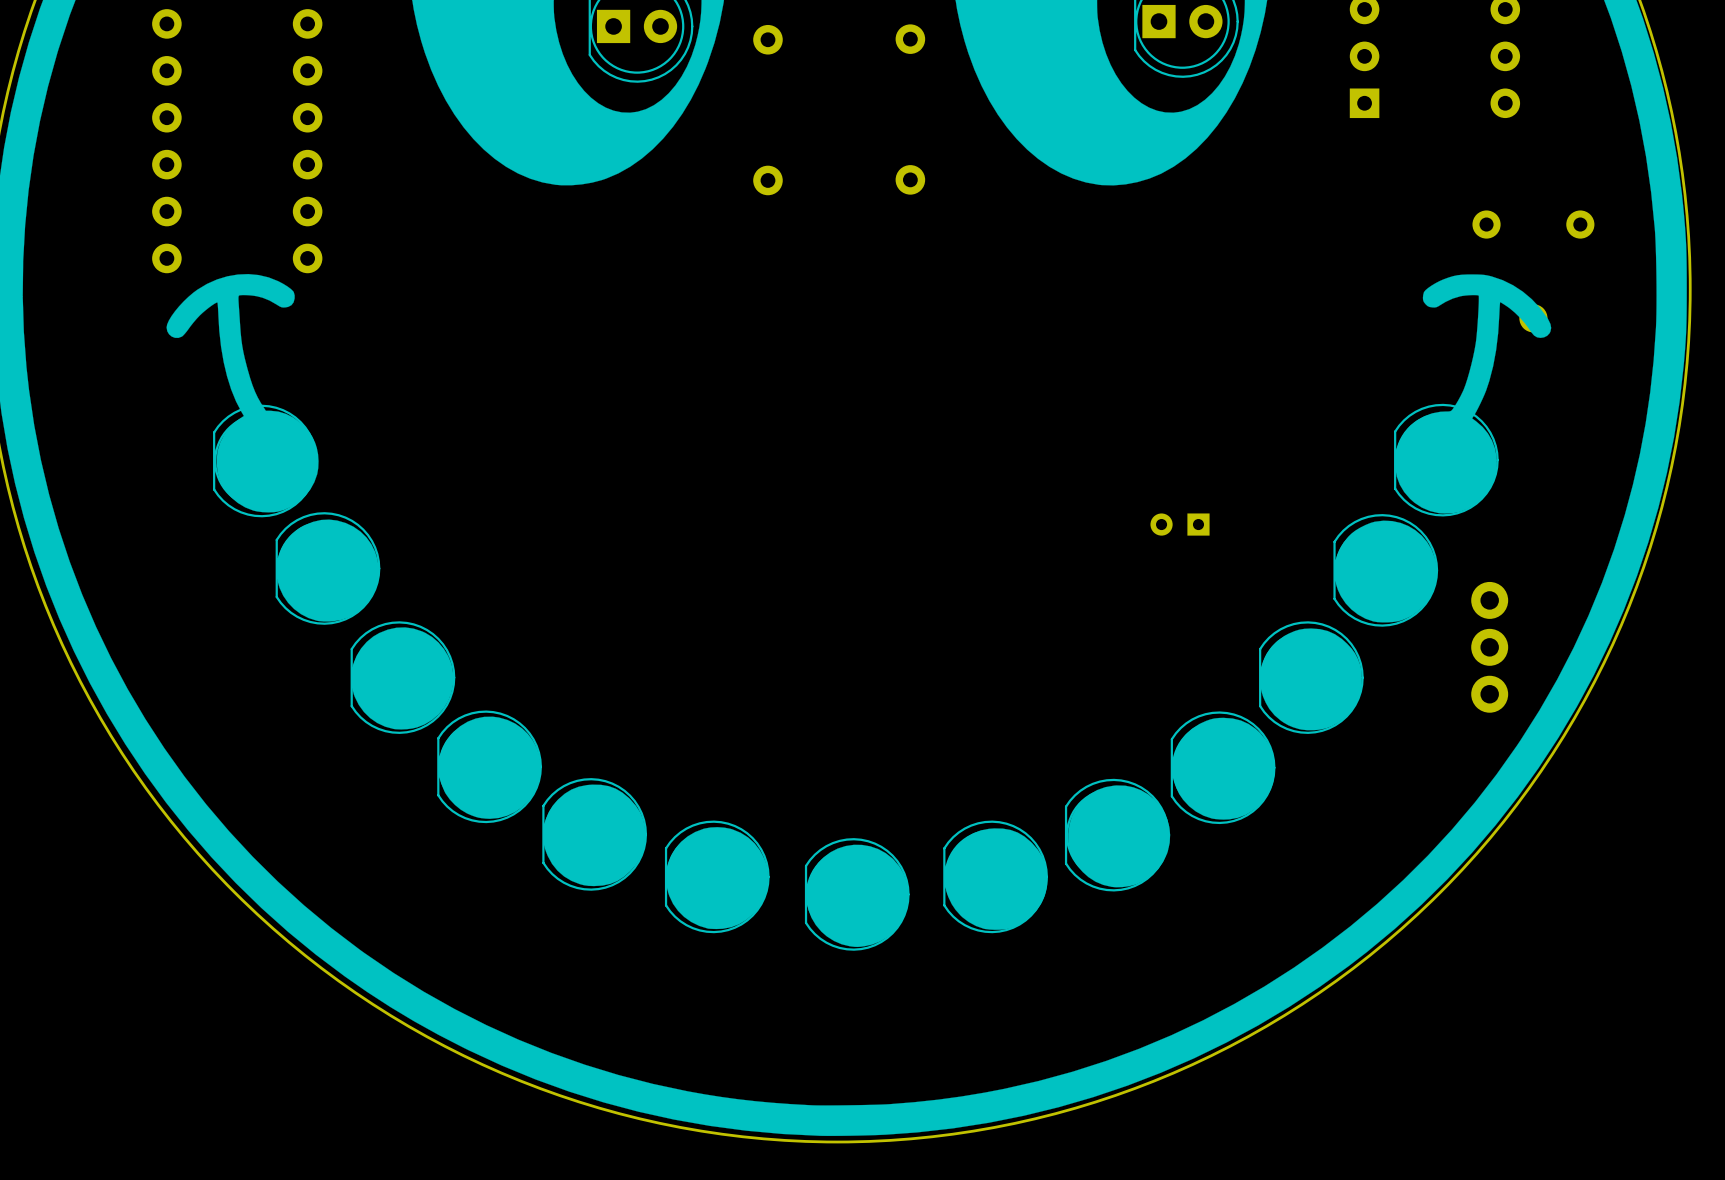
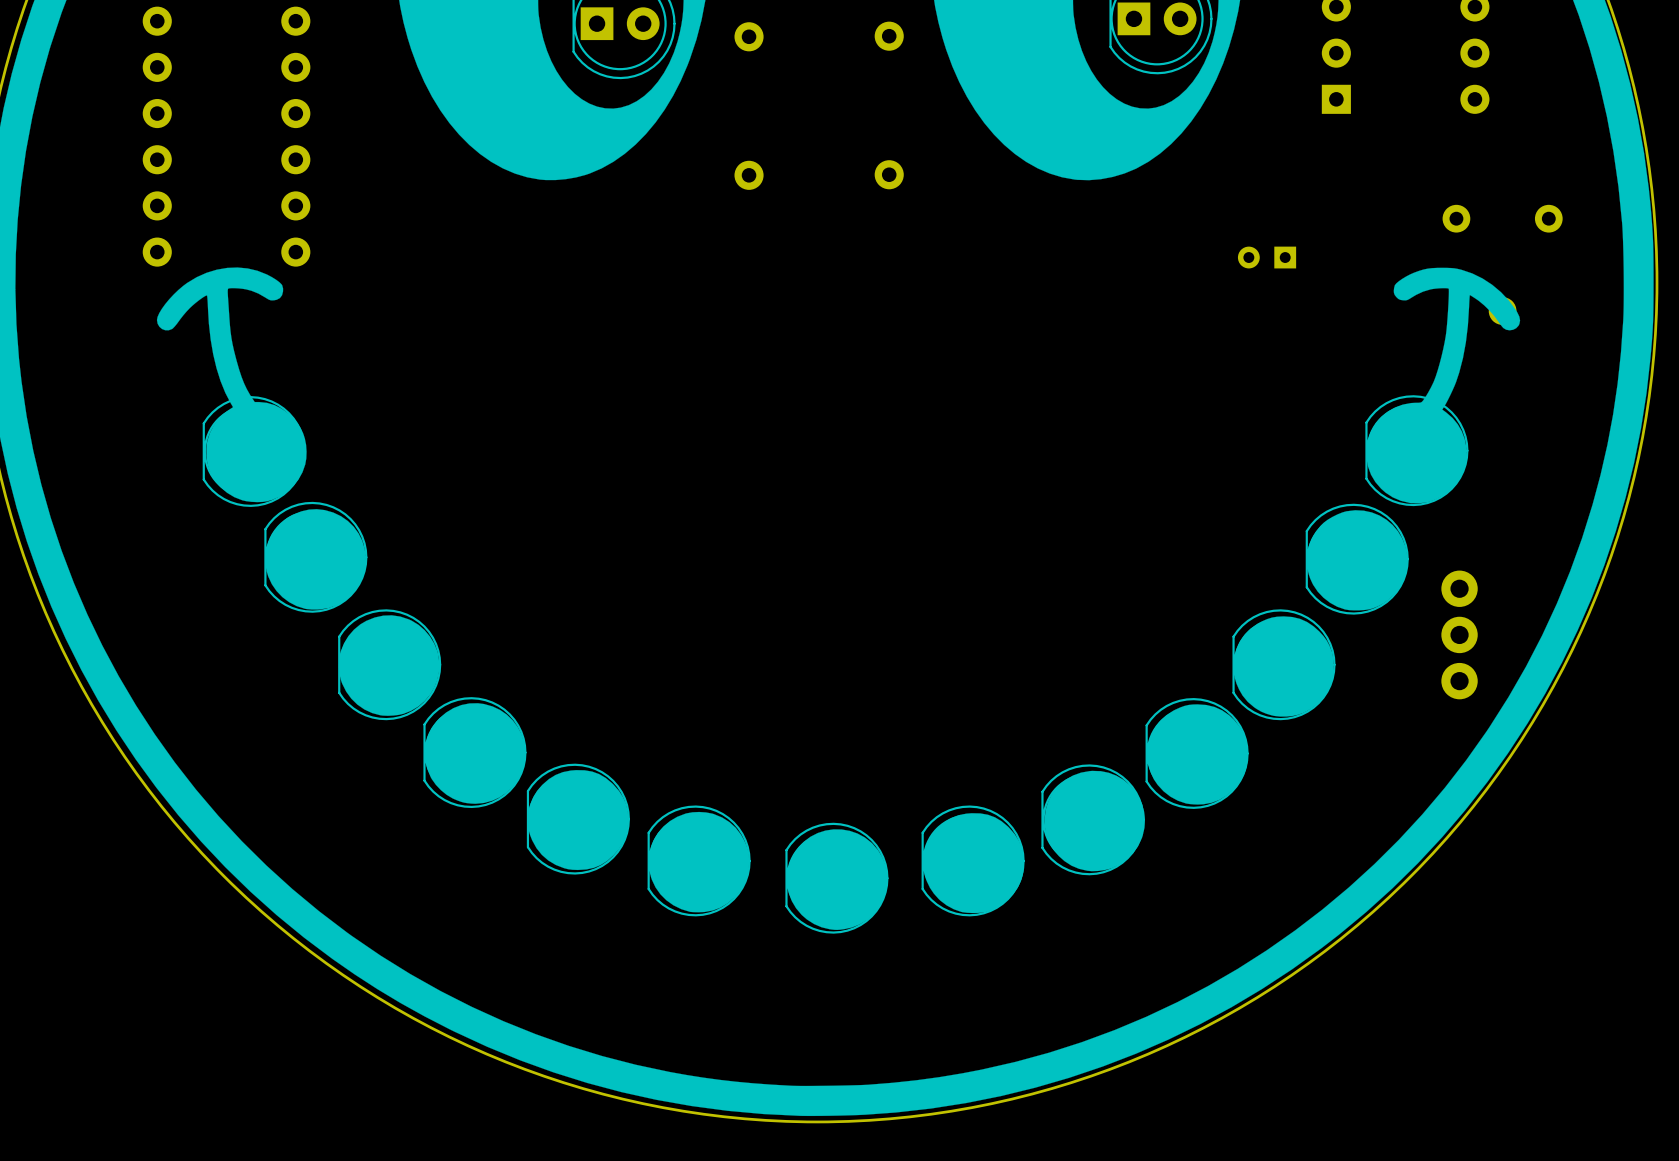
part position: (1180, 524) -> (1267, 257)

